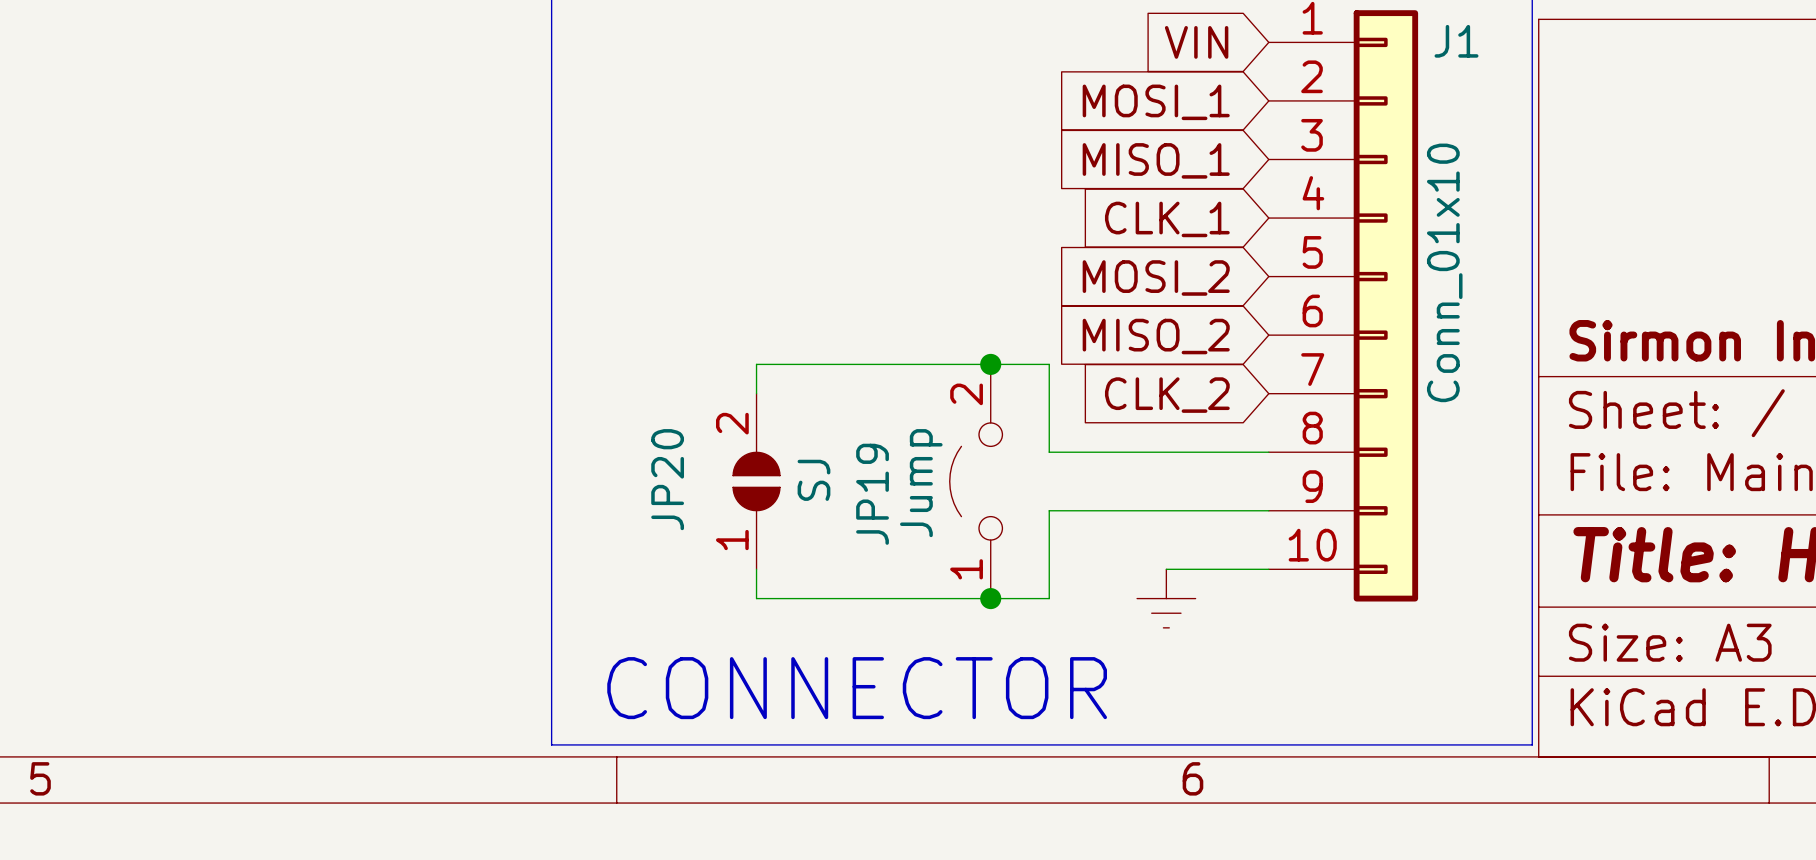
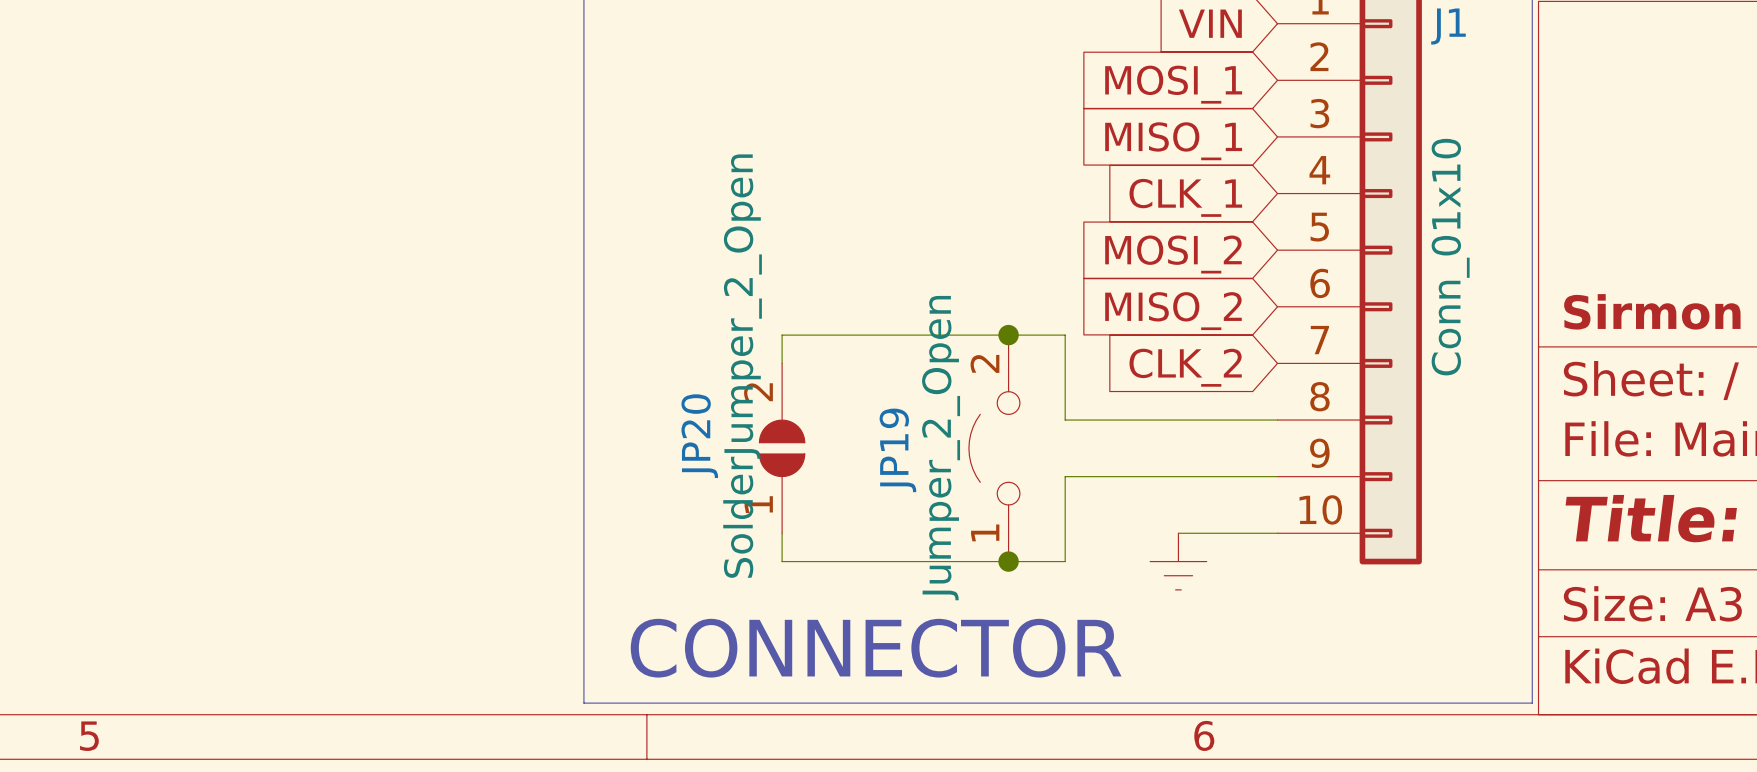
JP20 value: SJ (813, 480) -> SolderJumper_2_Open (742, 366)
JP19 value: Jump (921, 483) -> Jumper_2_Open (941, 448)

